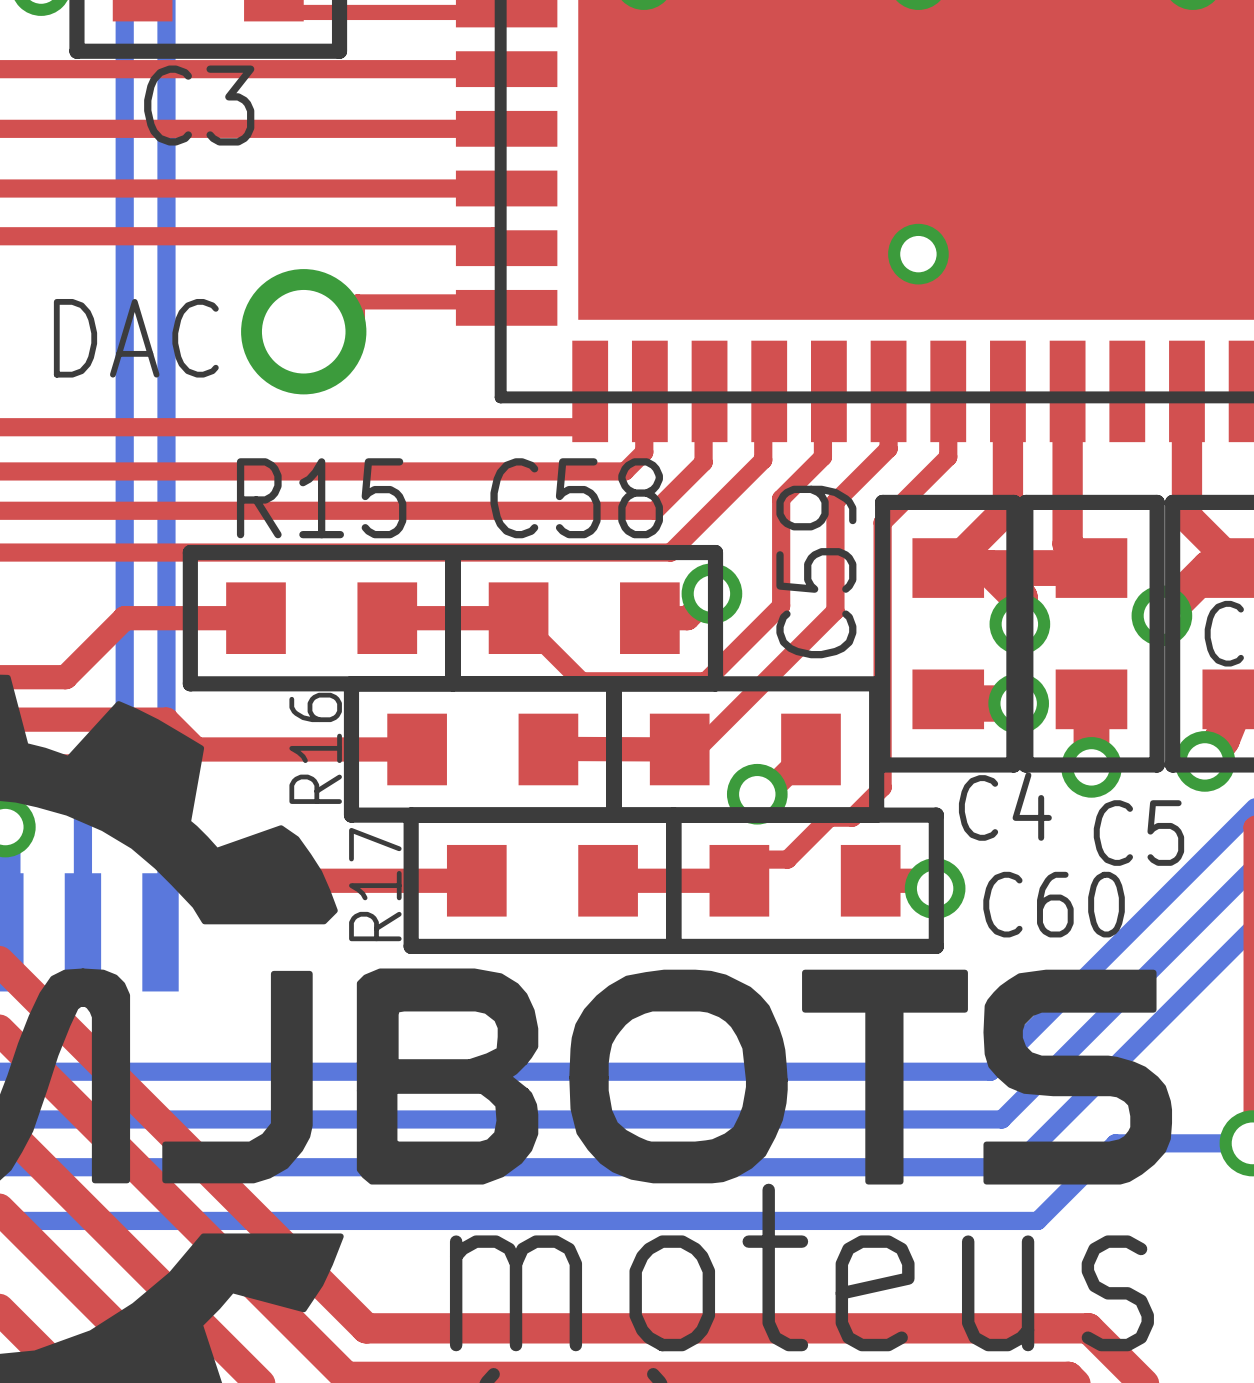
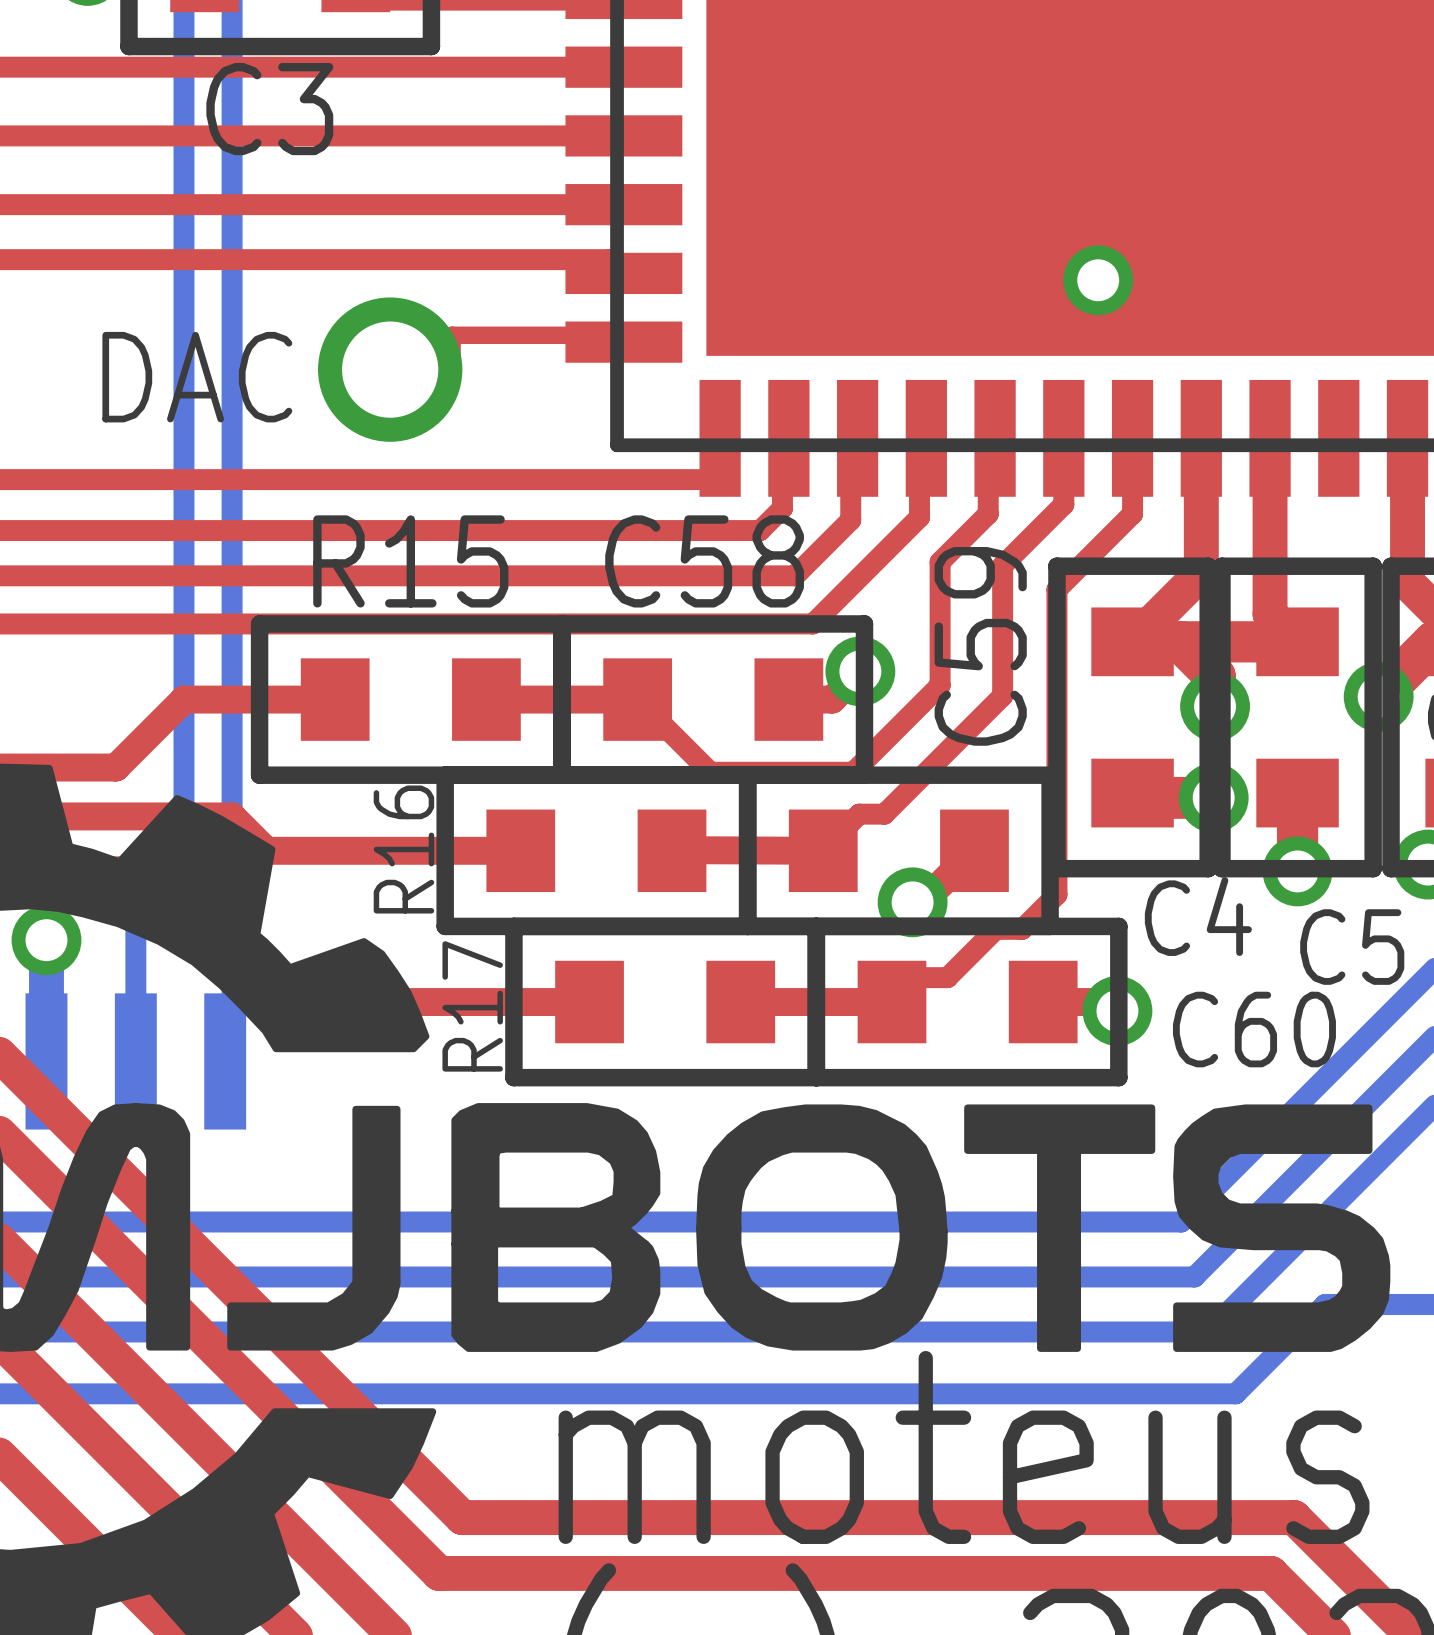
top track: (835, 611) (697, 749) (679, 749) -> (1002, 691) (1002, 695) (884, 814) (859, 814) (823, 850)

